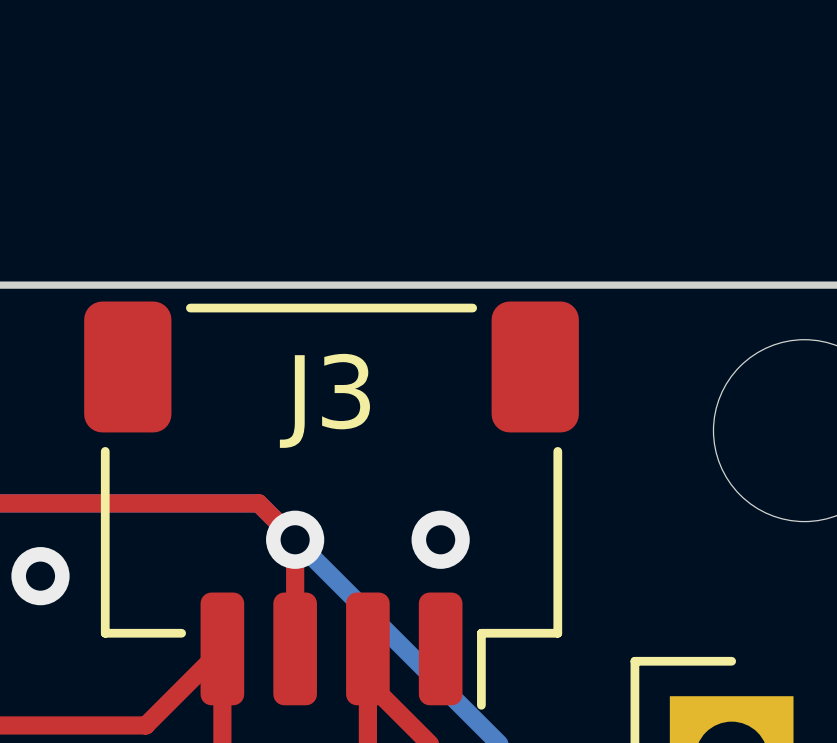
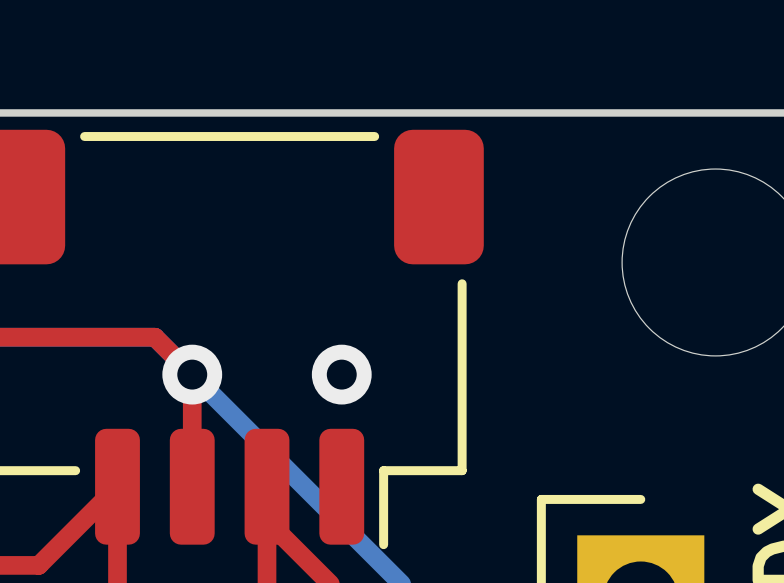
J3 name: J3 (324, 400) -> none

